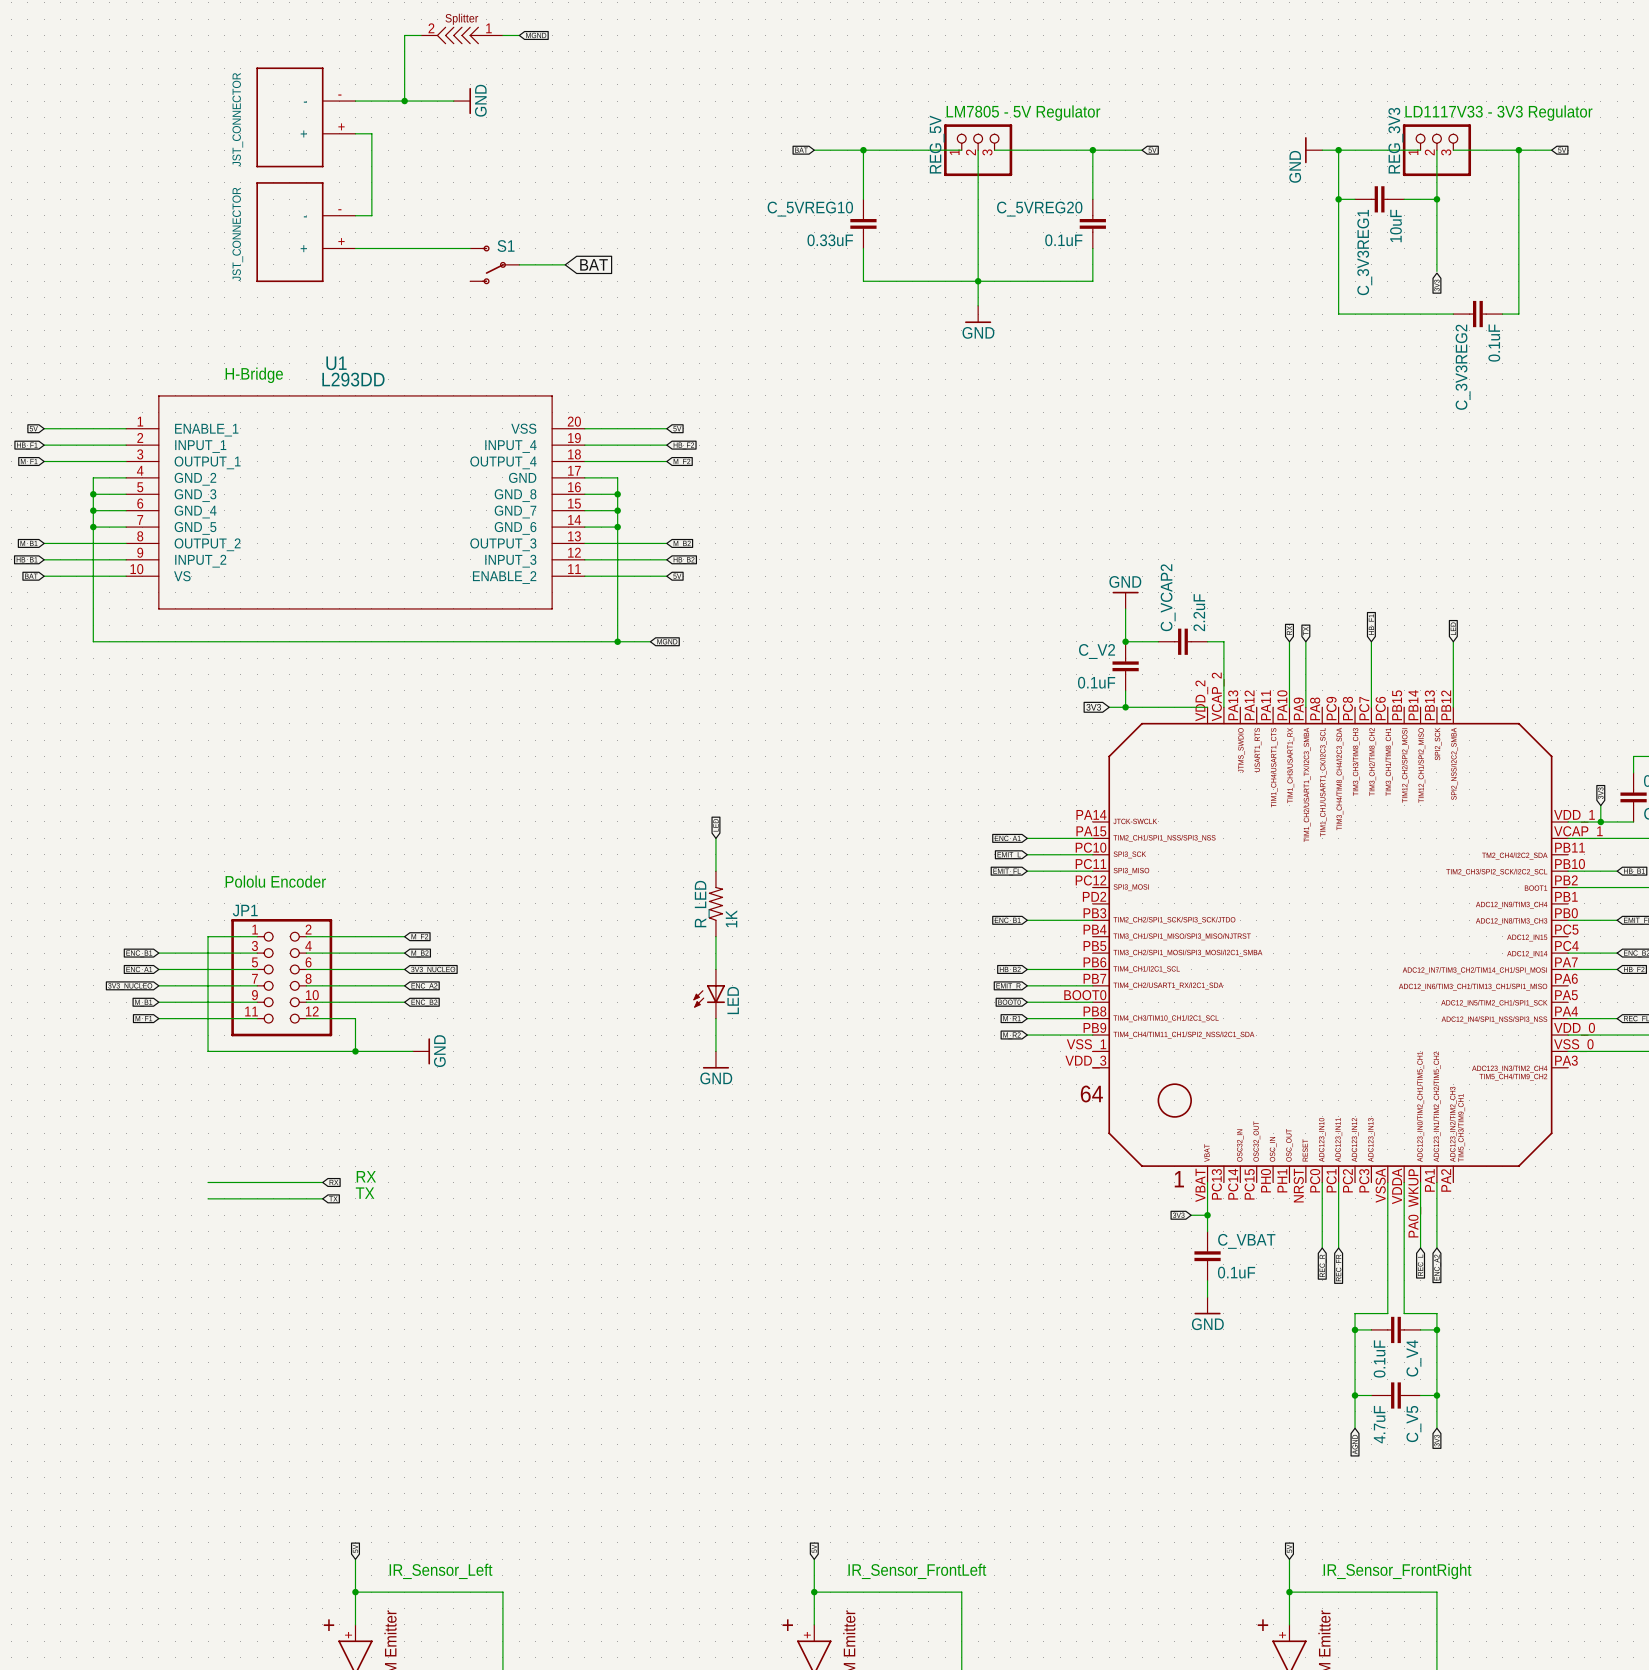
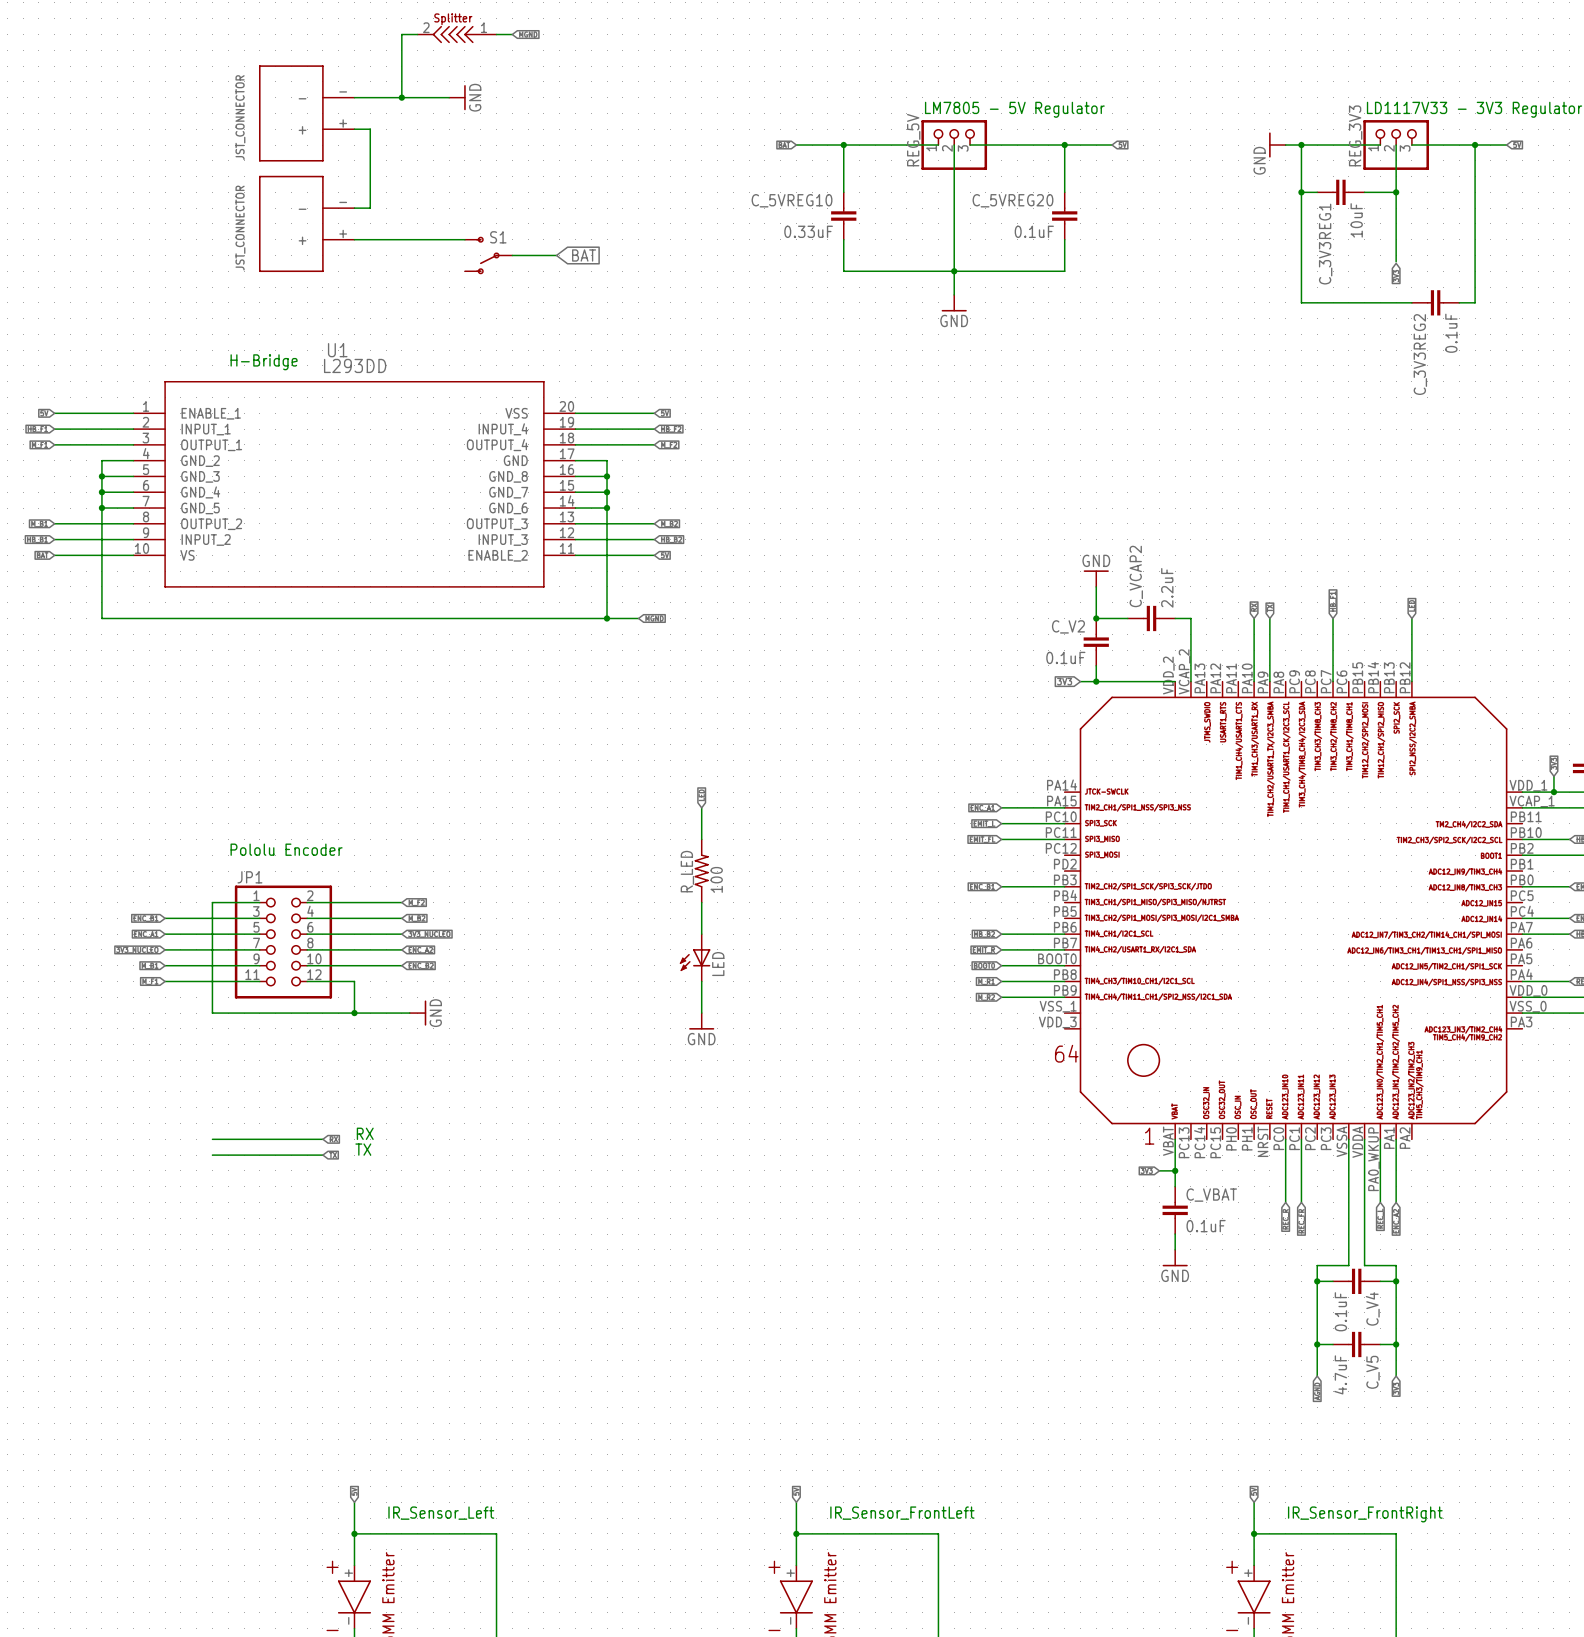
R_LED value: 1K (731, 918) -> 100 (716, 879)

